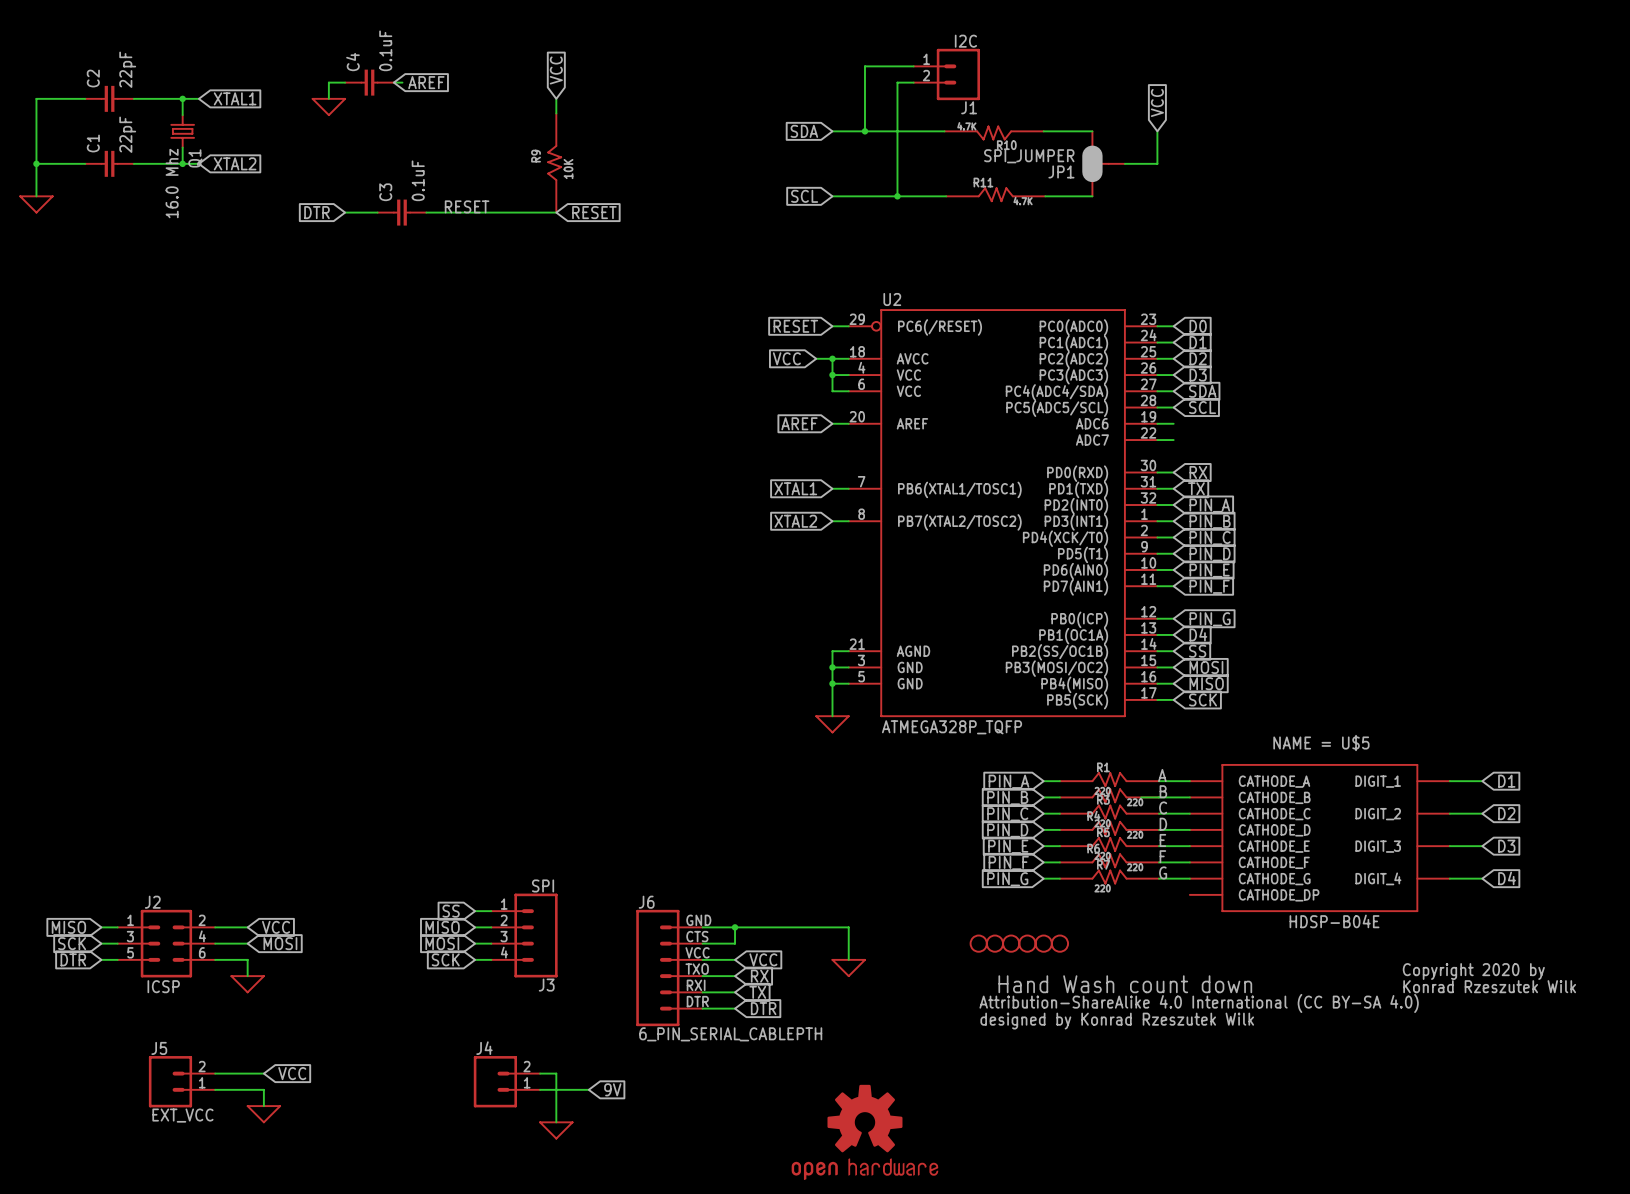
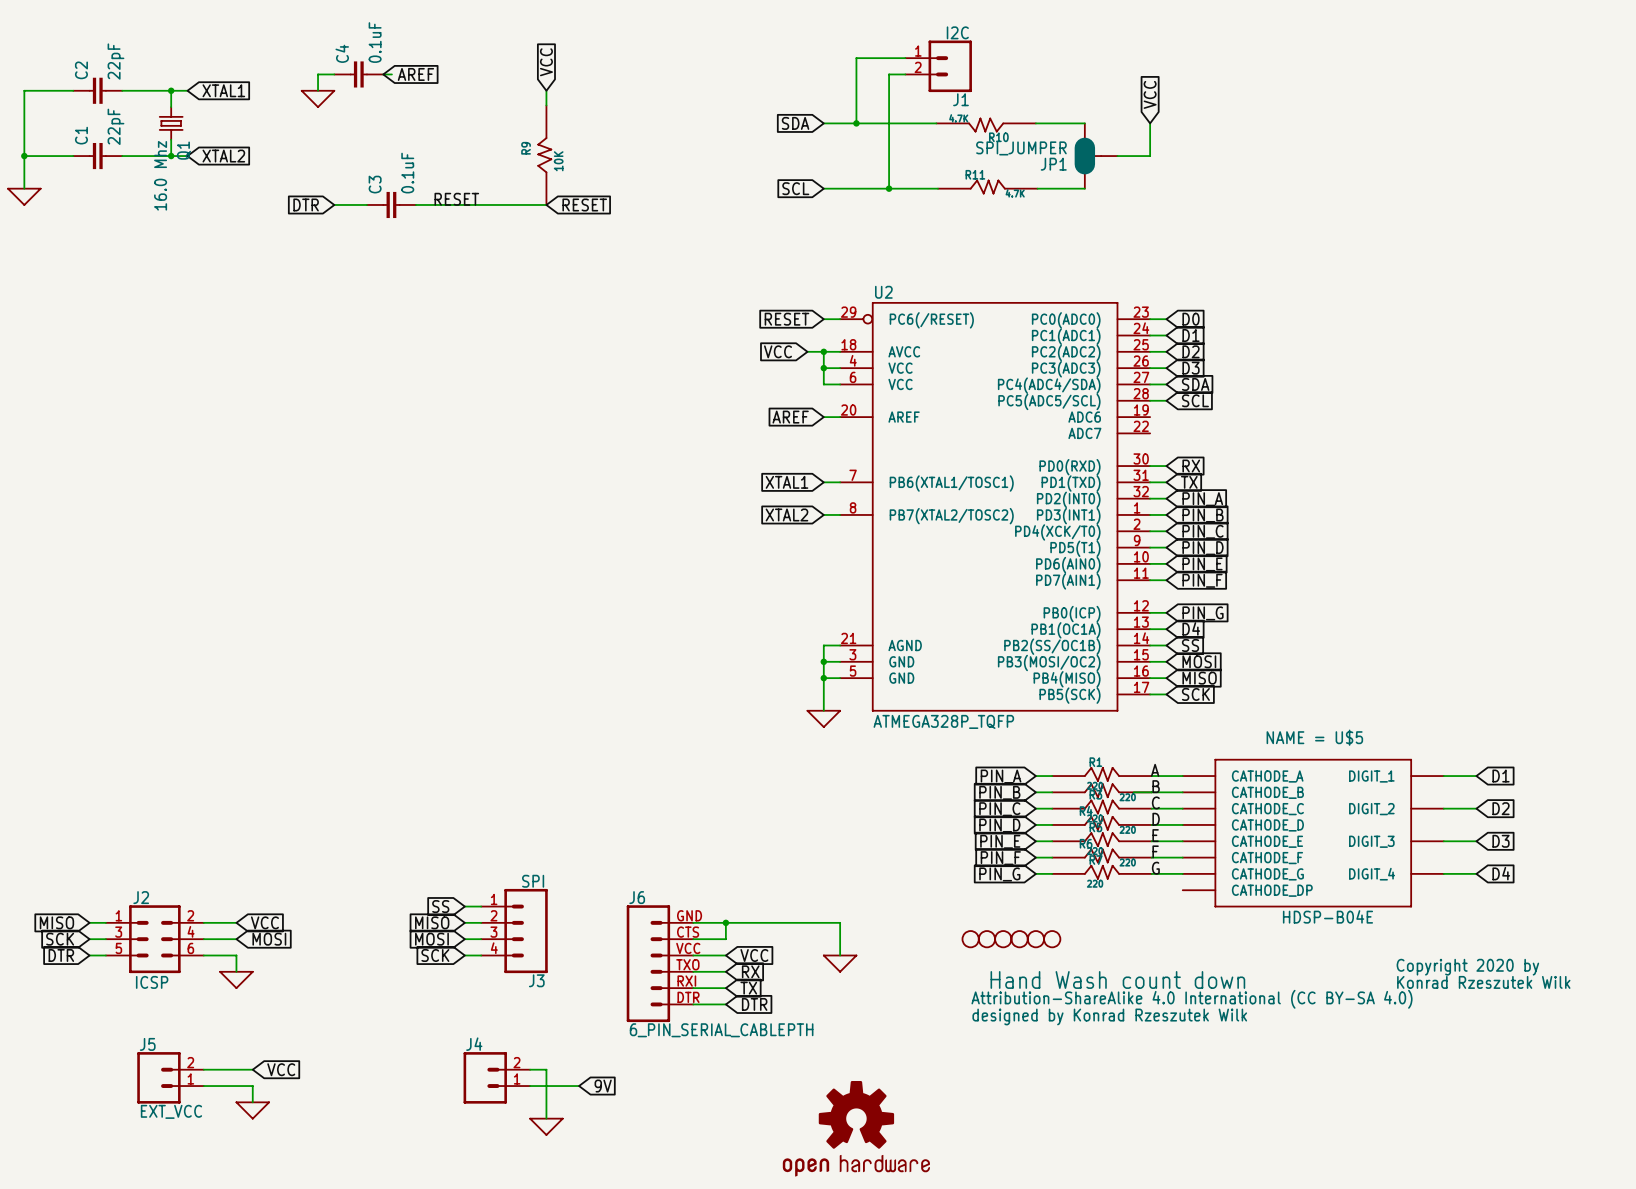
wire: (1157, 423) (1173, 423) -> none
wire: (1157, 440) (1173, 440) -> none

